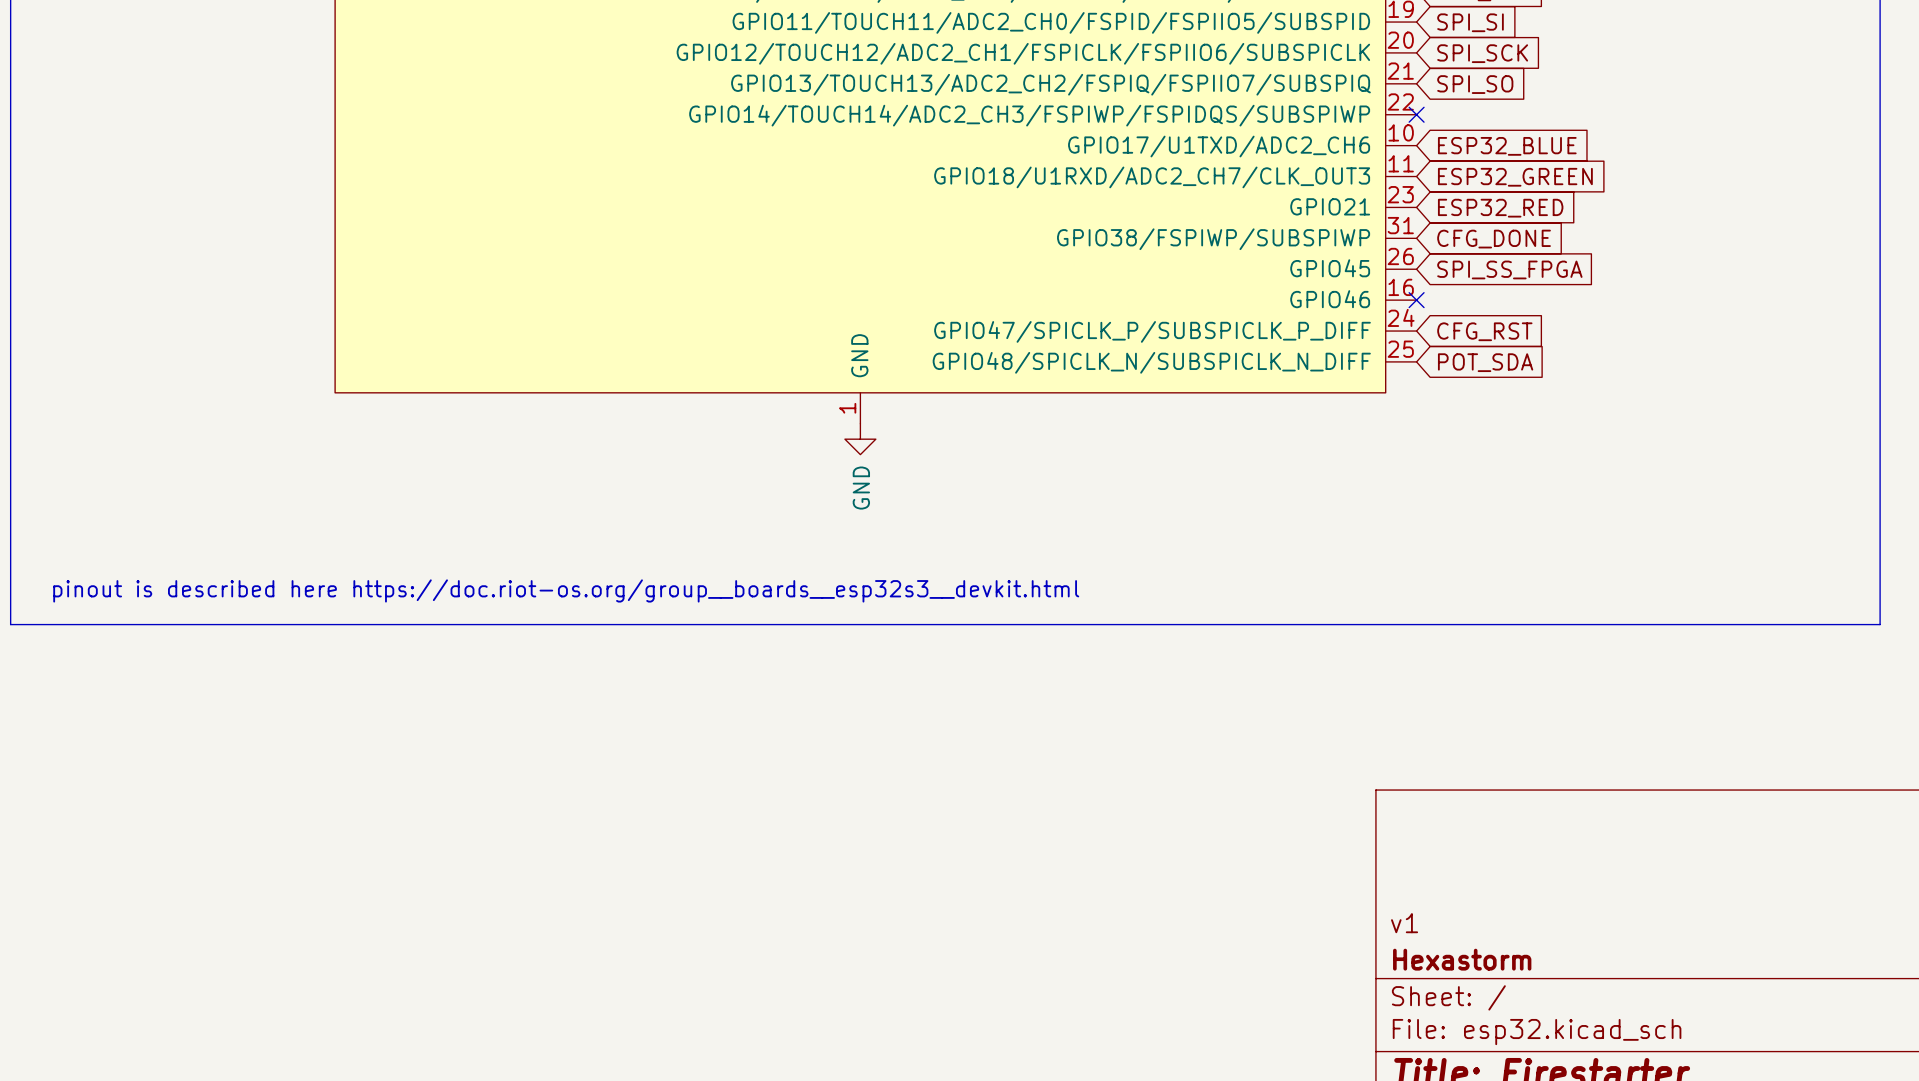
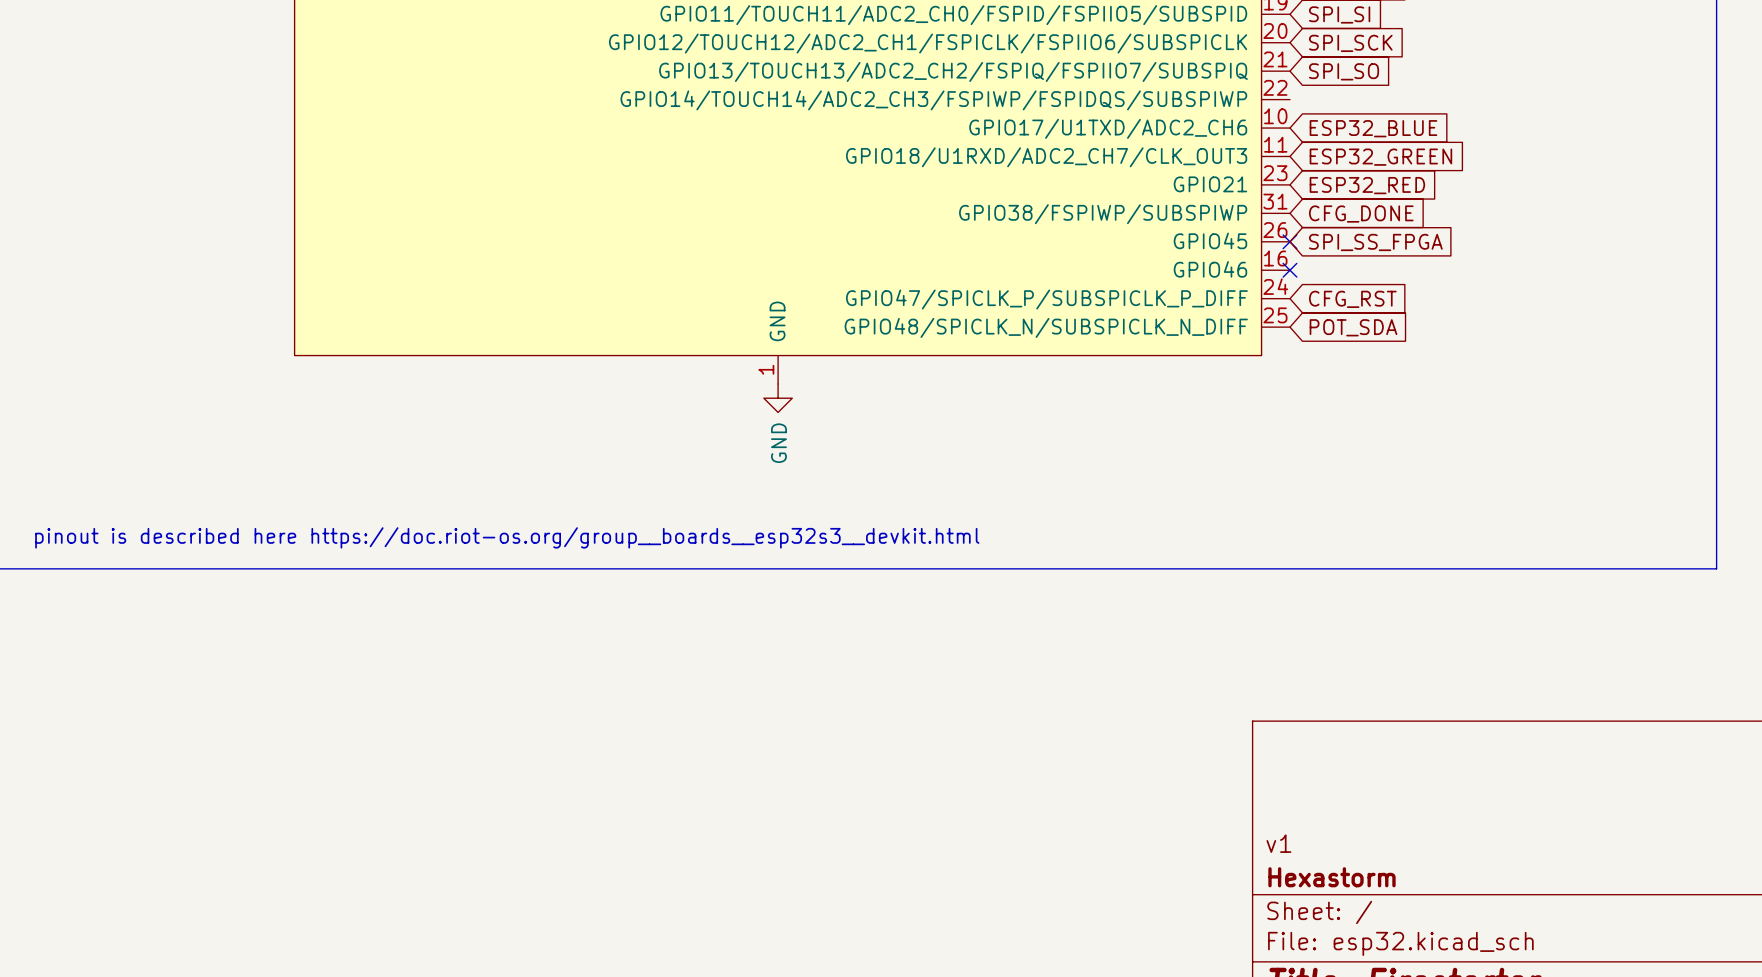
no-connect mark: (1416, 114) -> none
no-connect mark: none -> (1290, 241)

